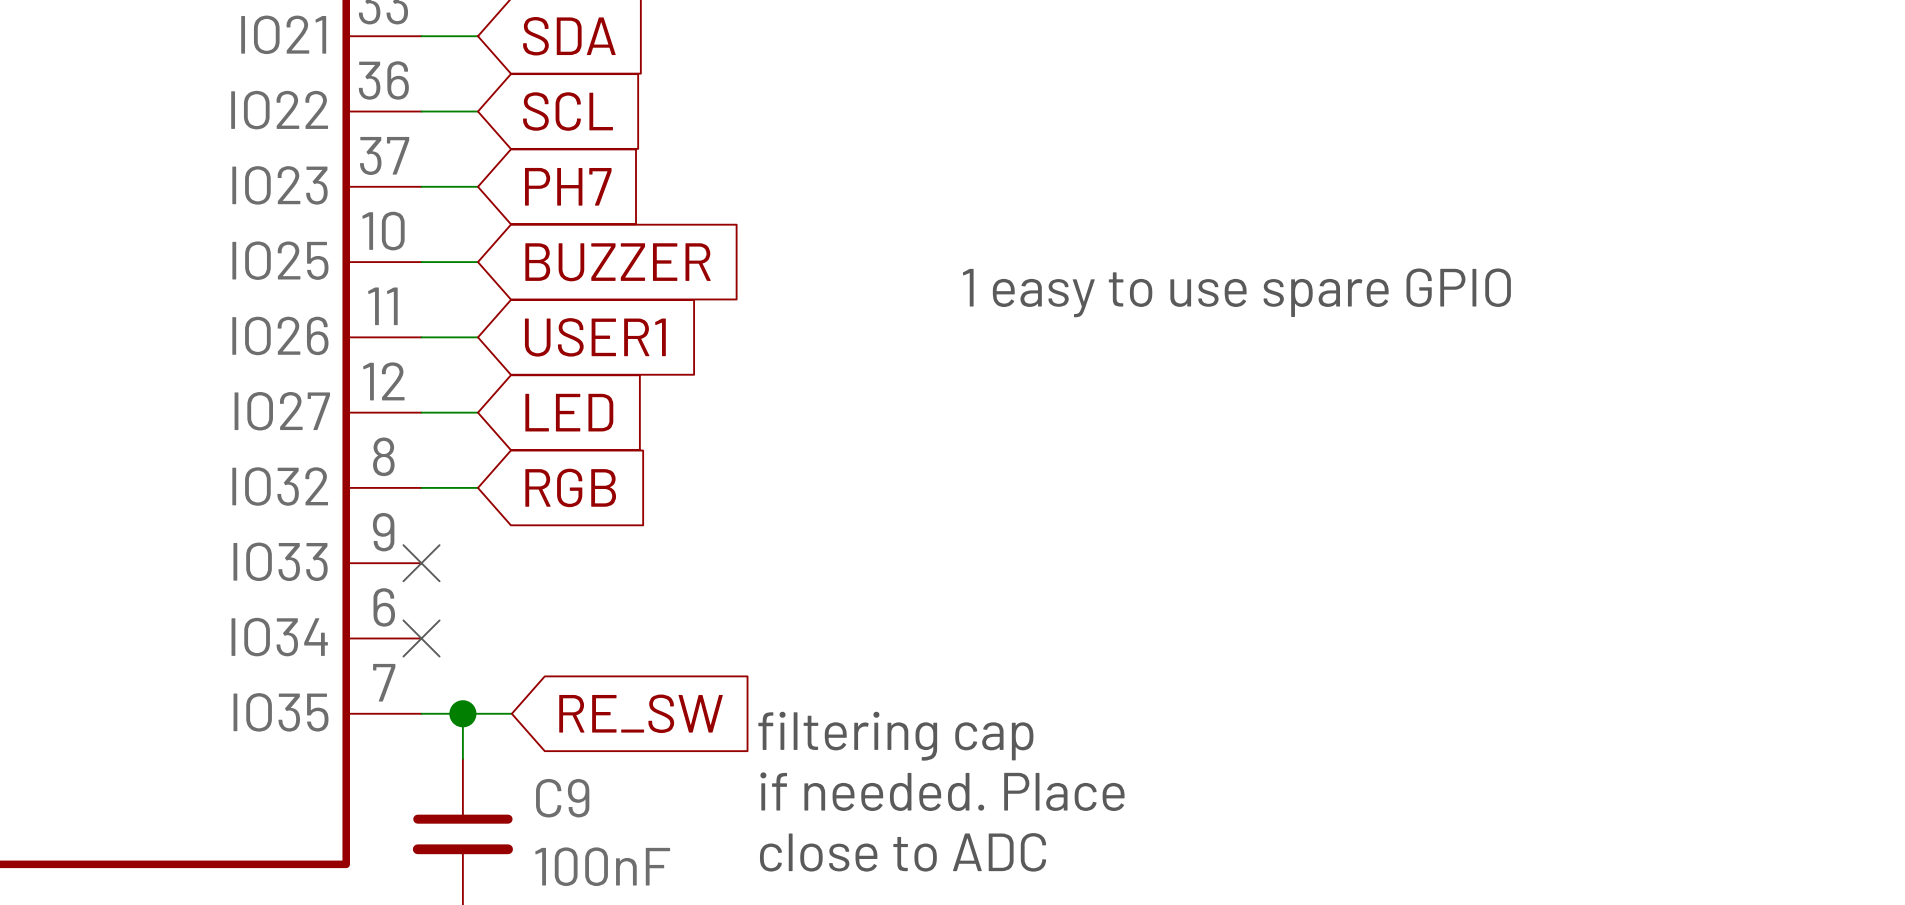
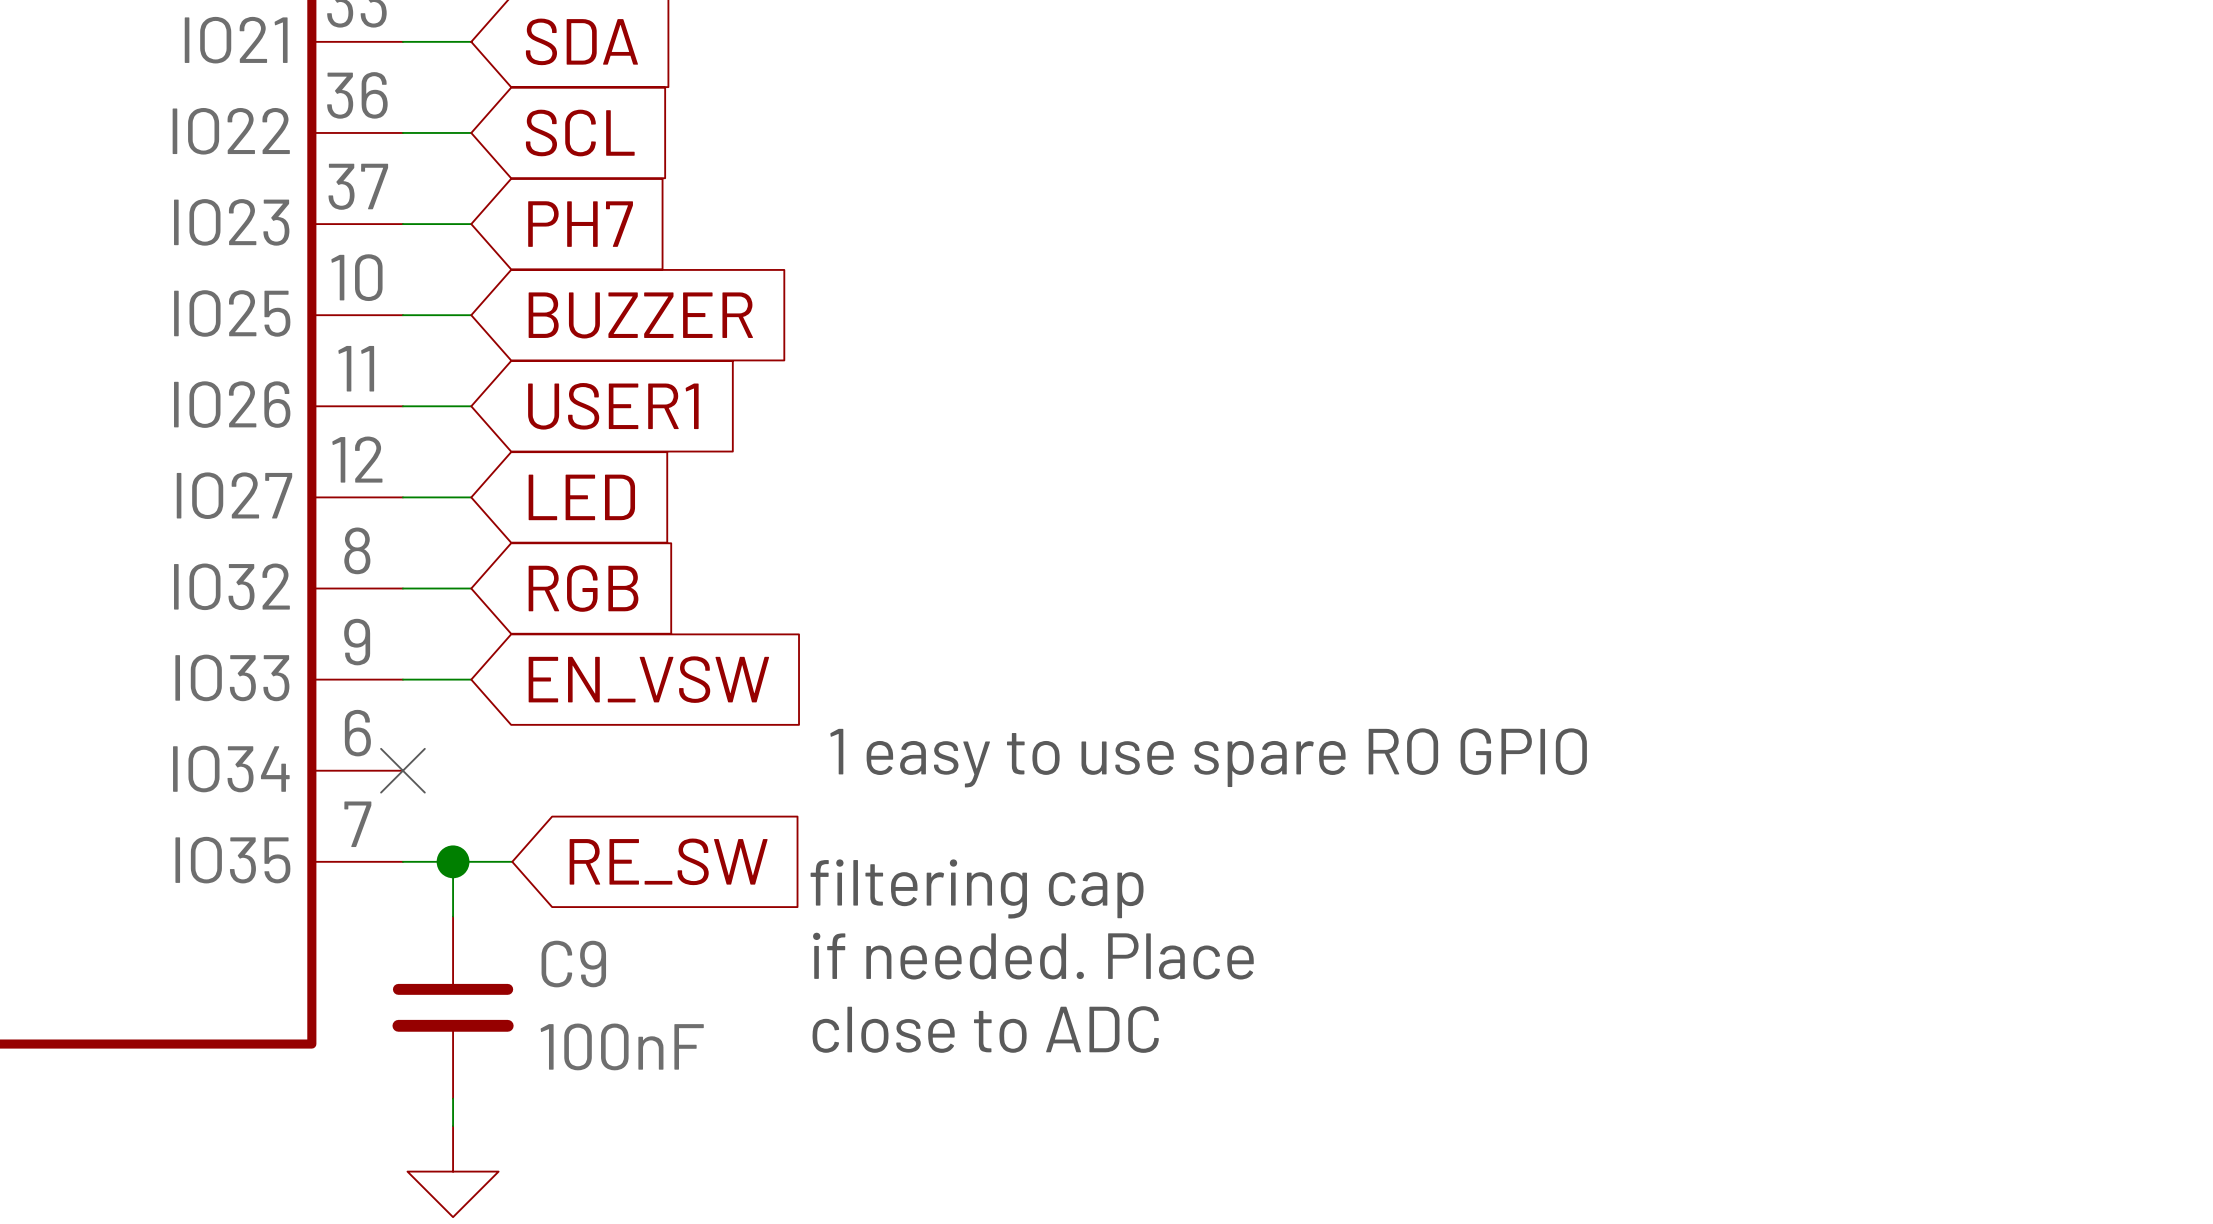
text: 1 easy to use spare GPIO (1236, 292) -> none
wire: none -> (402, 679) (471, 679)
no-connect mark: (421, 563) -> none
global label: none -> EN_VSW (648, 679)
text: none -> 1 easy to use spare RO GPIO (1208, 757)

